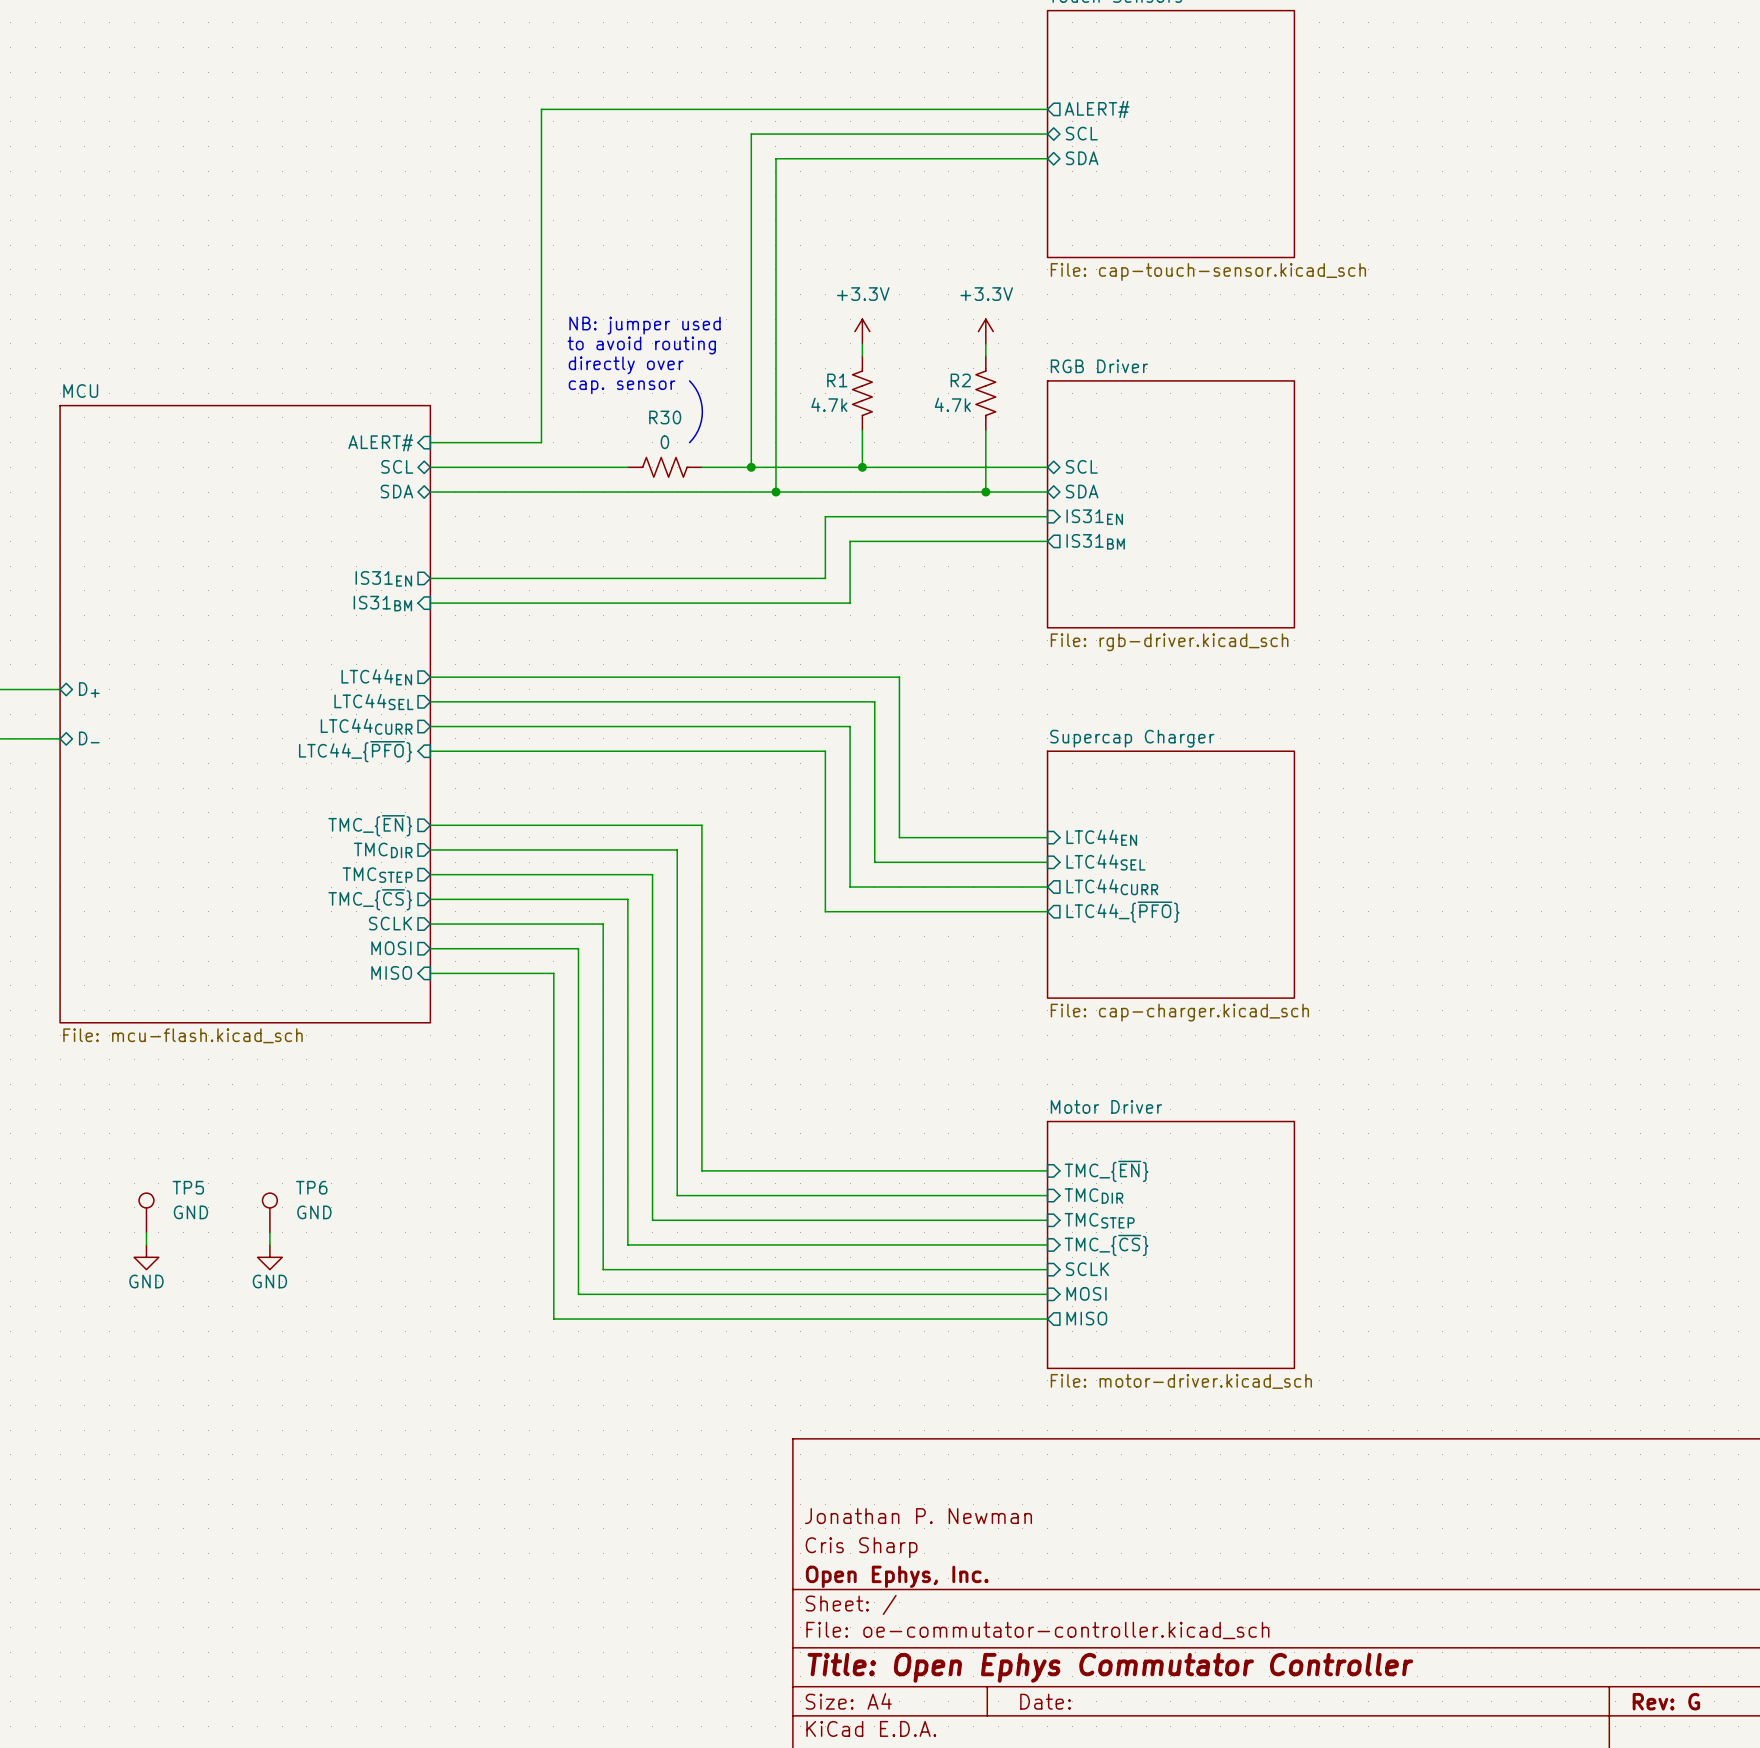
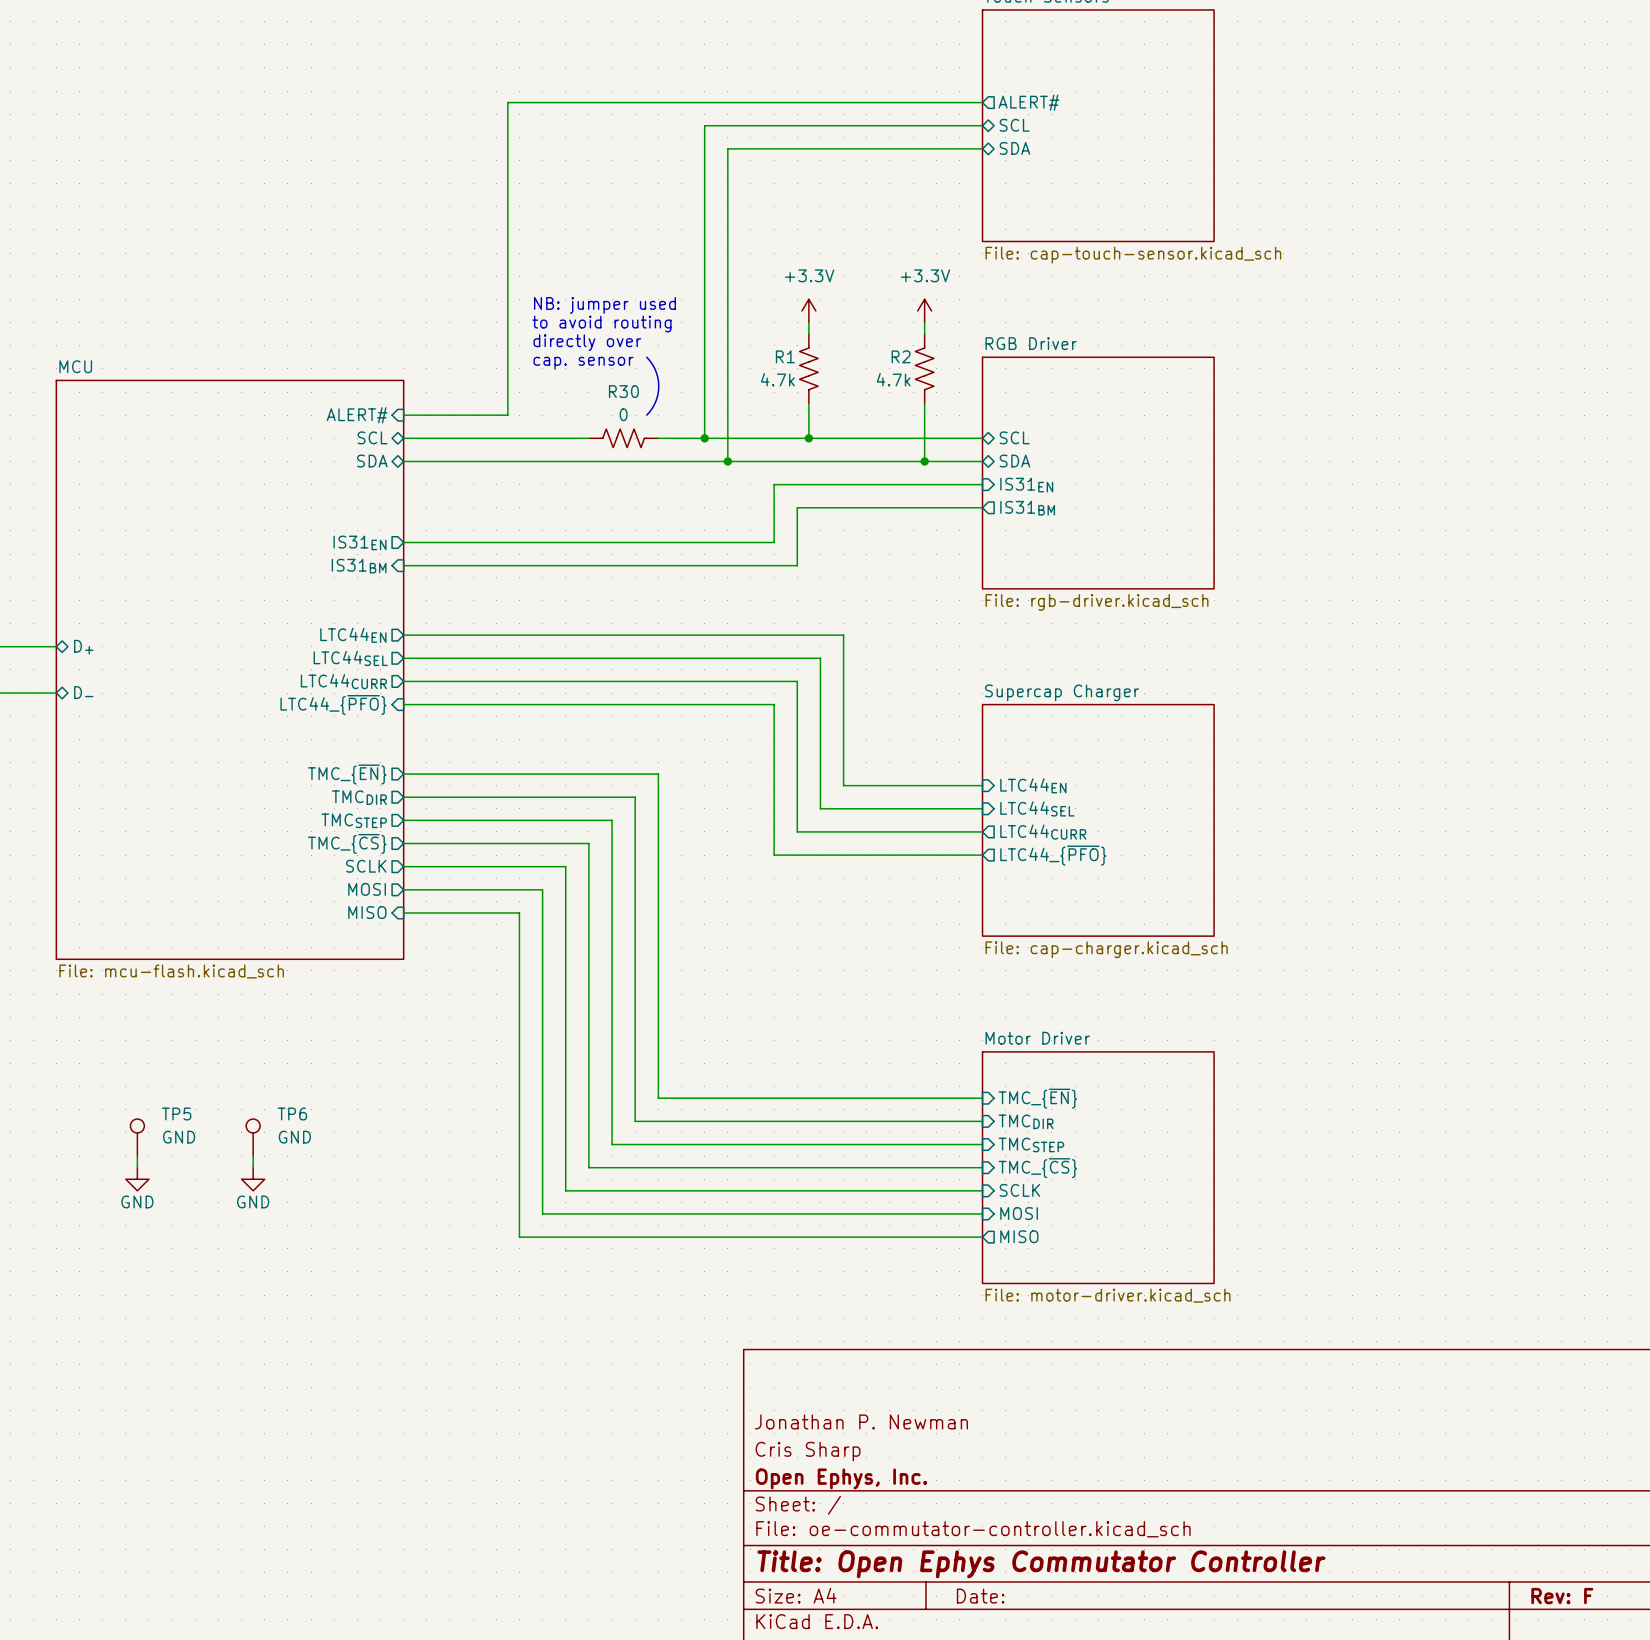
title block: Rev: G (1666, 1701) -> Rev: F (1562, 1596)

